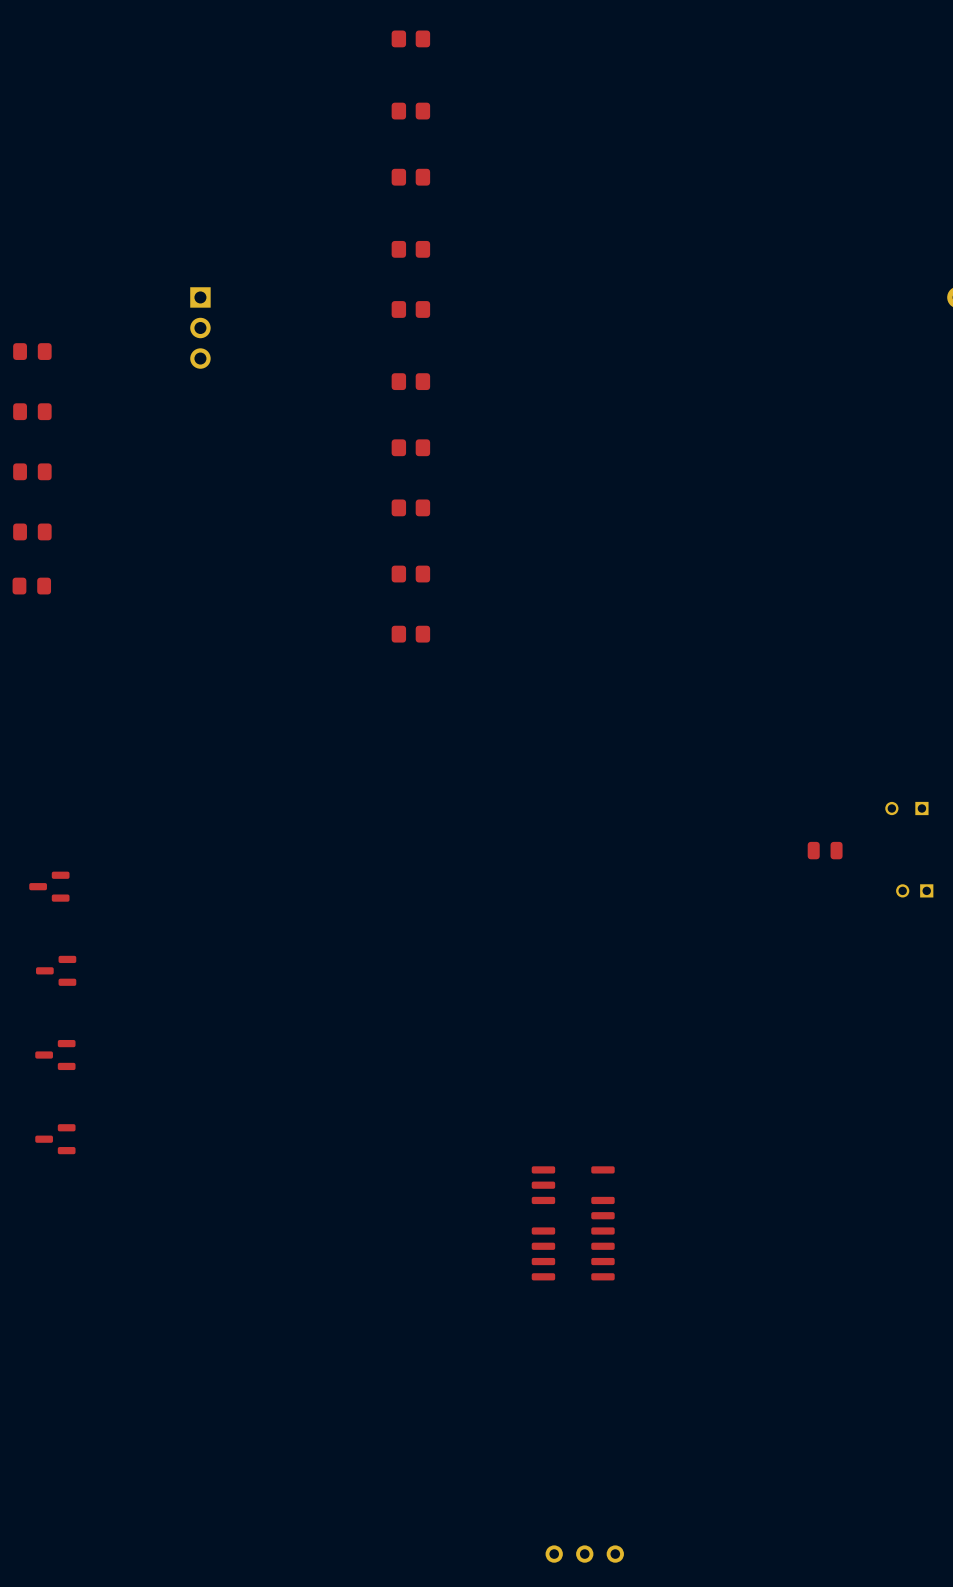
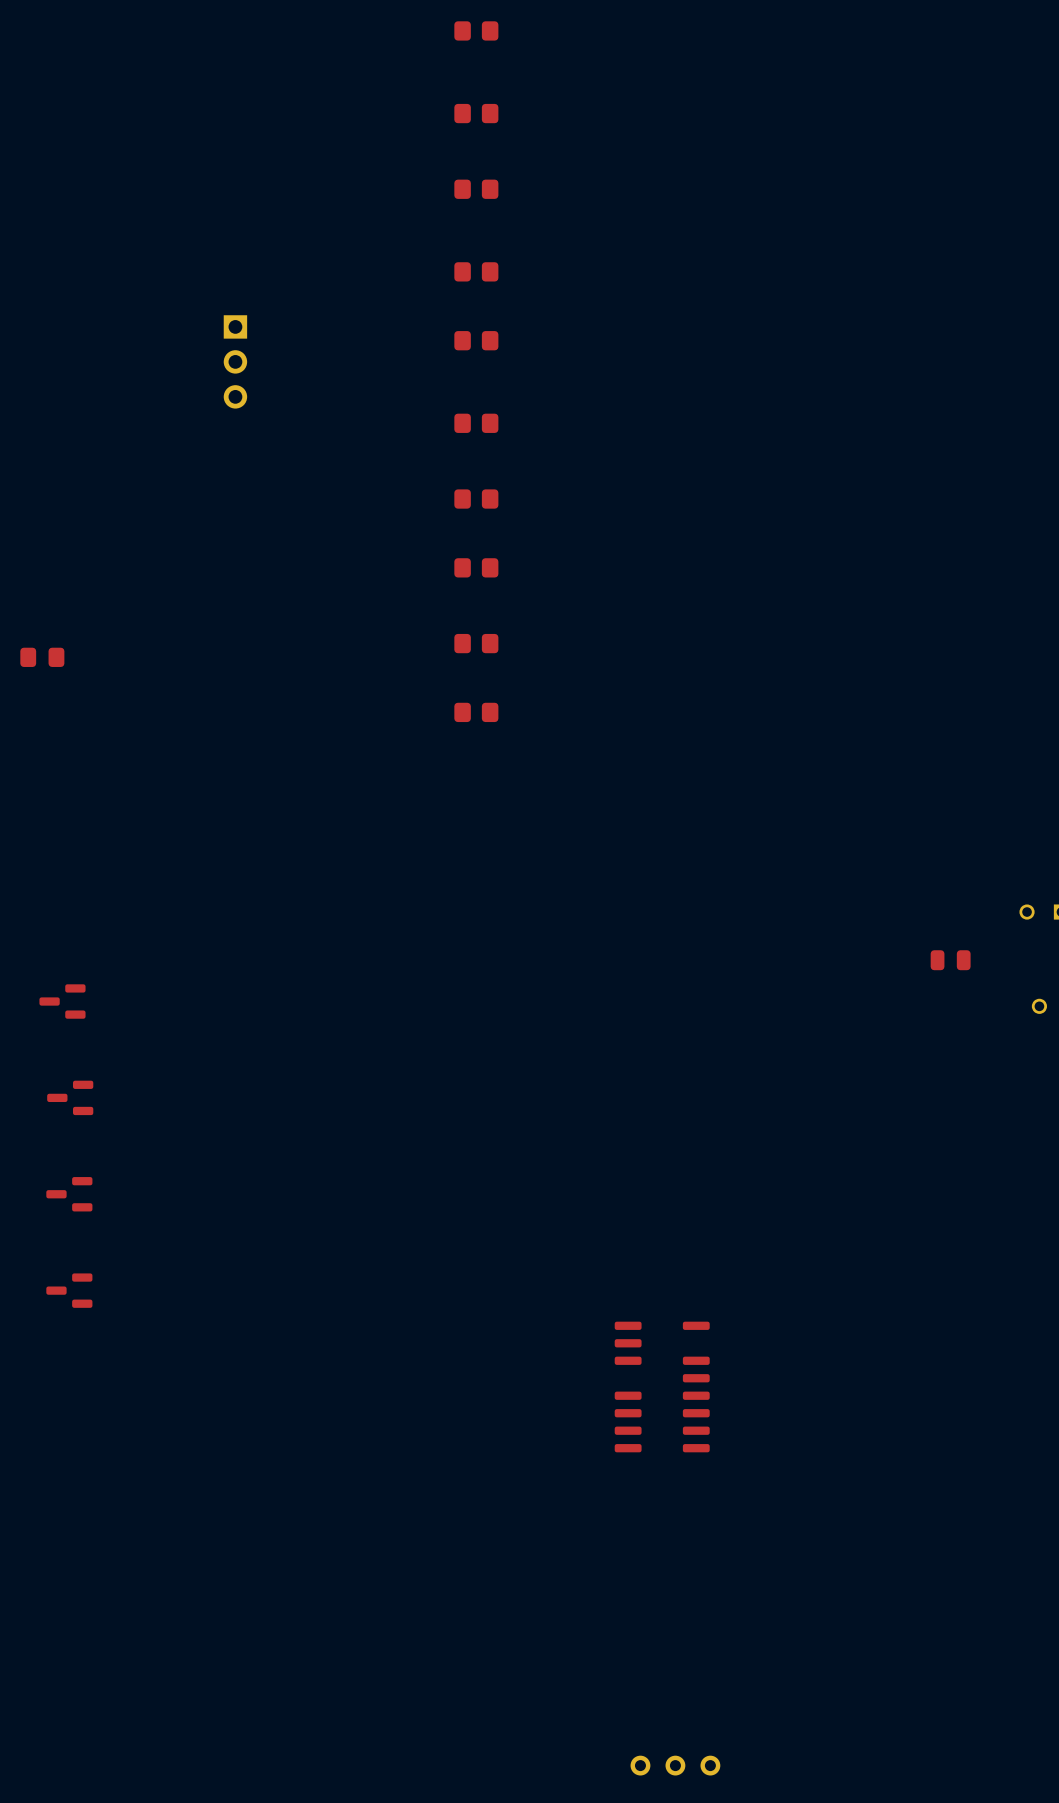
part: (32, 351) -> none
part: (32, 411) -> none
part: (32, 471) -> none
part: (32, 531) -> none

